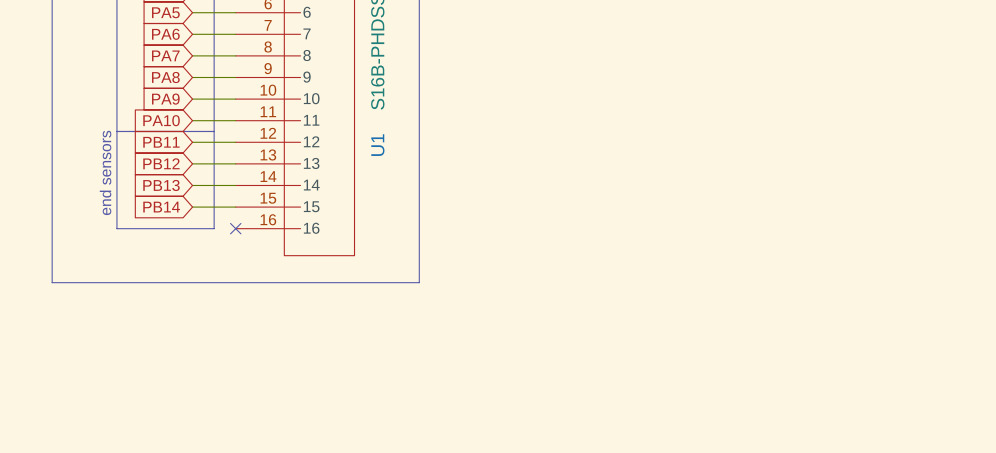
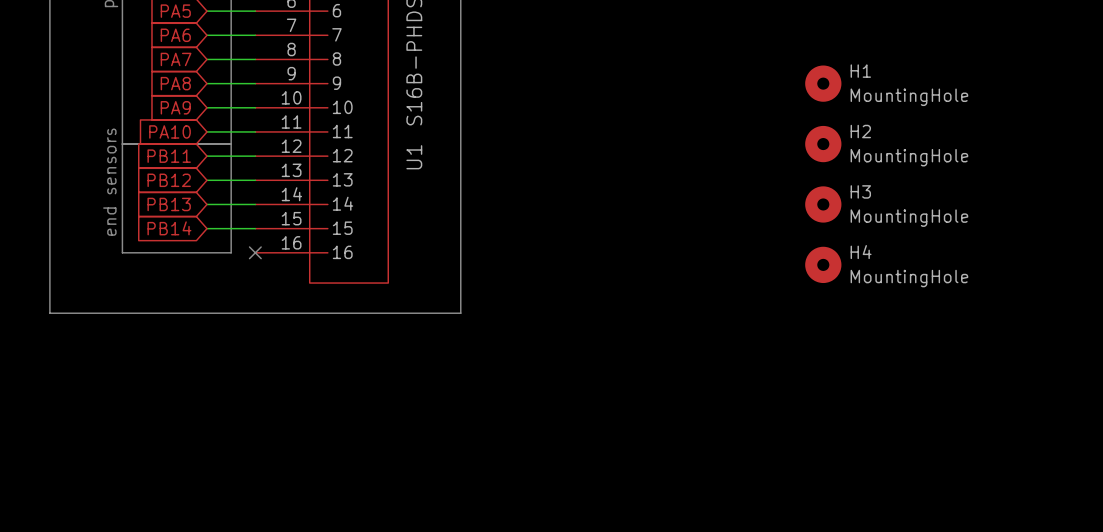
H1: none -> MountingHole (823, 83)
H2: none -> MountingHole (823, 144)
H3: none -> MountingHole (823, 204)
H4: none -> MountingHole (823, 264)

